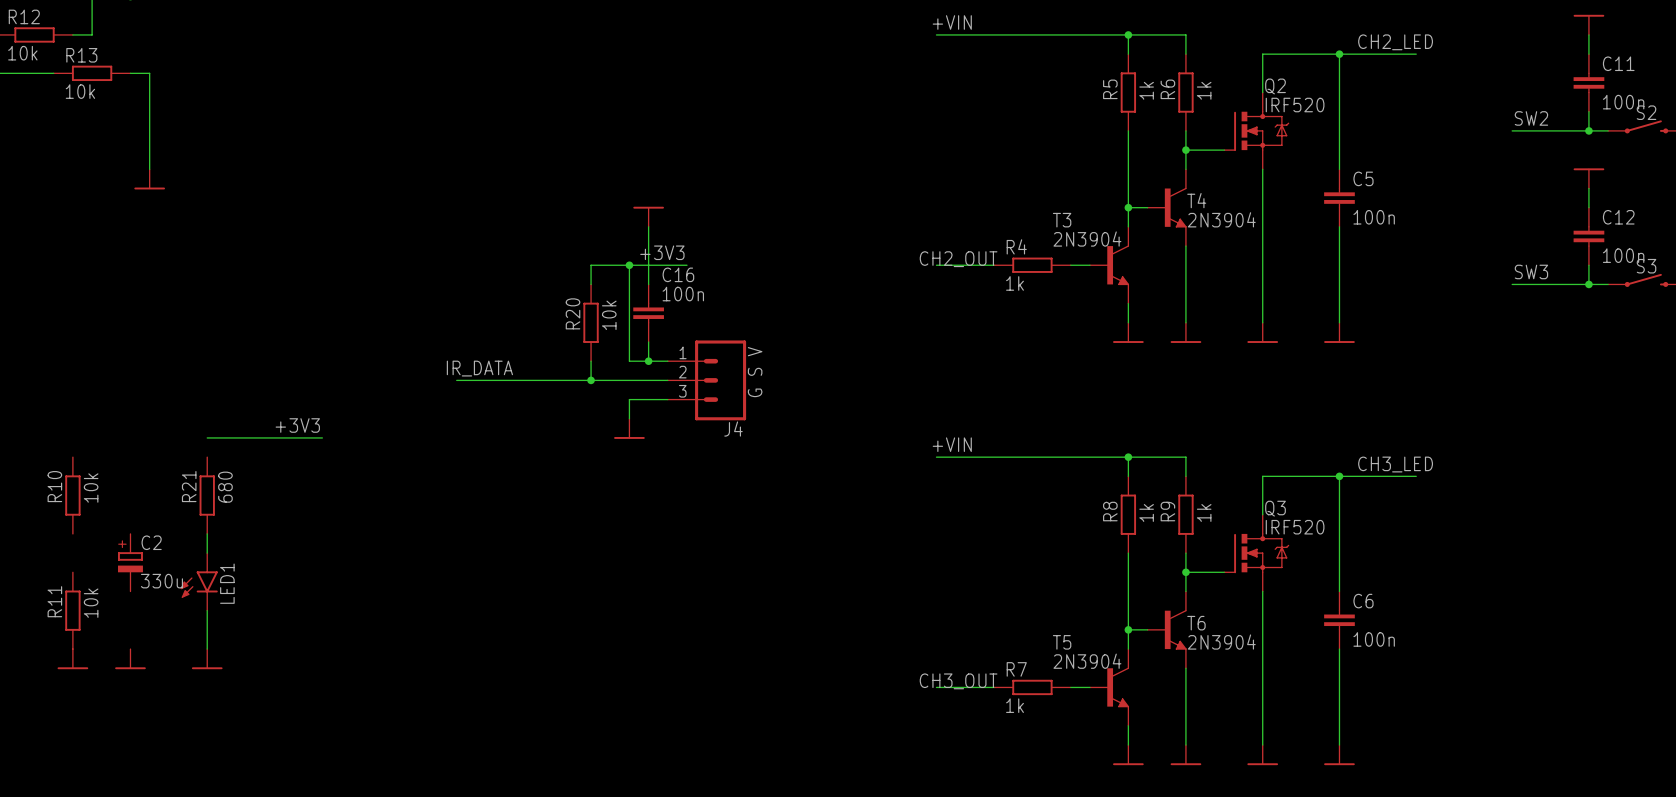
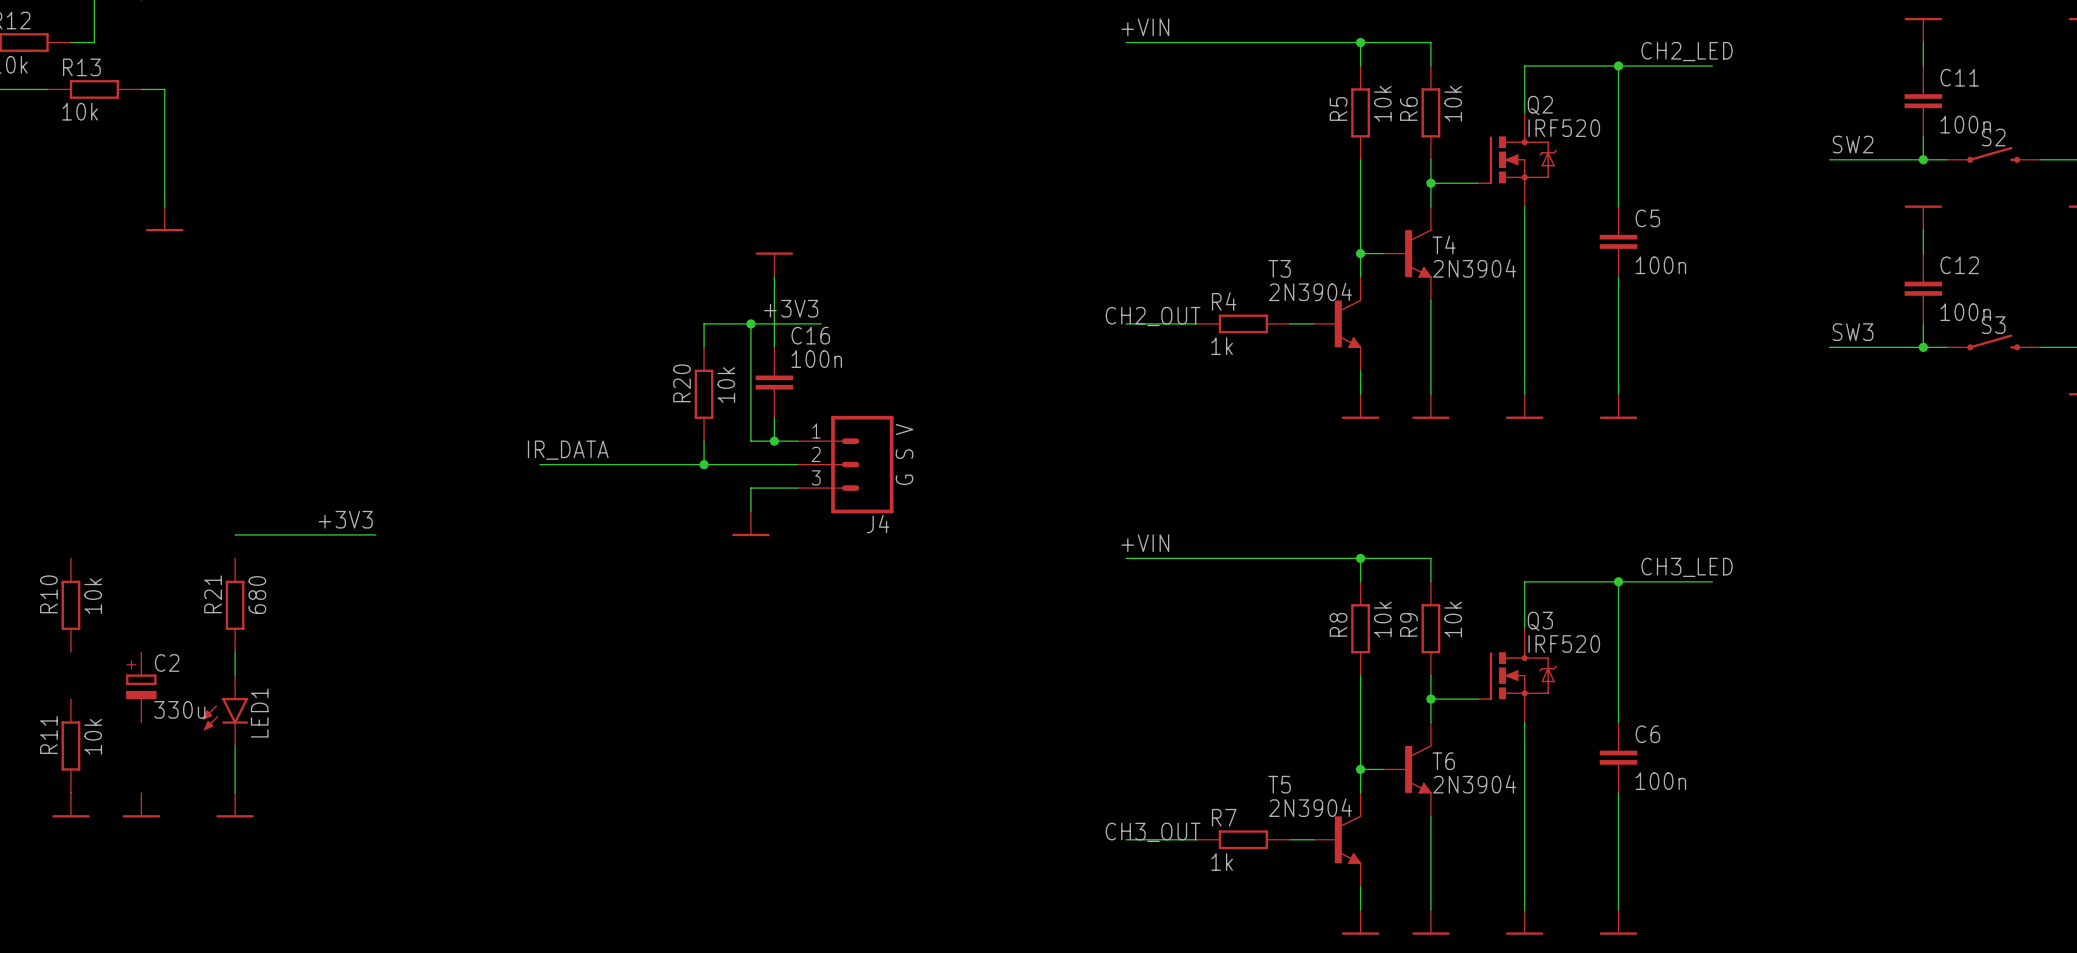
R5 value: 1k (1146, 90) -> 10k (1382, 103)
R6 value: 1k (1204, 90) -> 10k (1453, 103)
R8 value: 1k (1146, 512) -> 10k (1382, 619)
R9 value: 1k (1204, 512) -> 10k (1453, 619)

